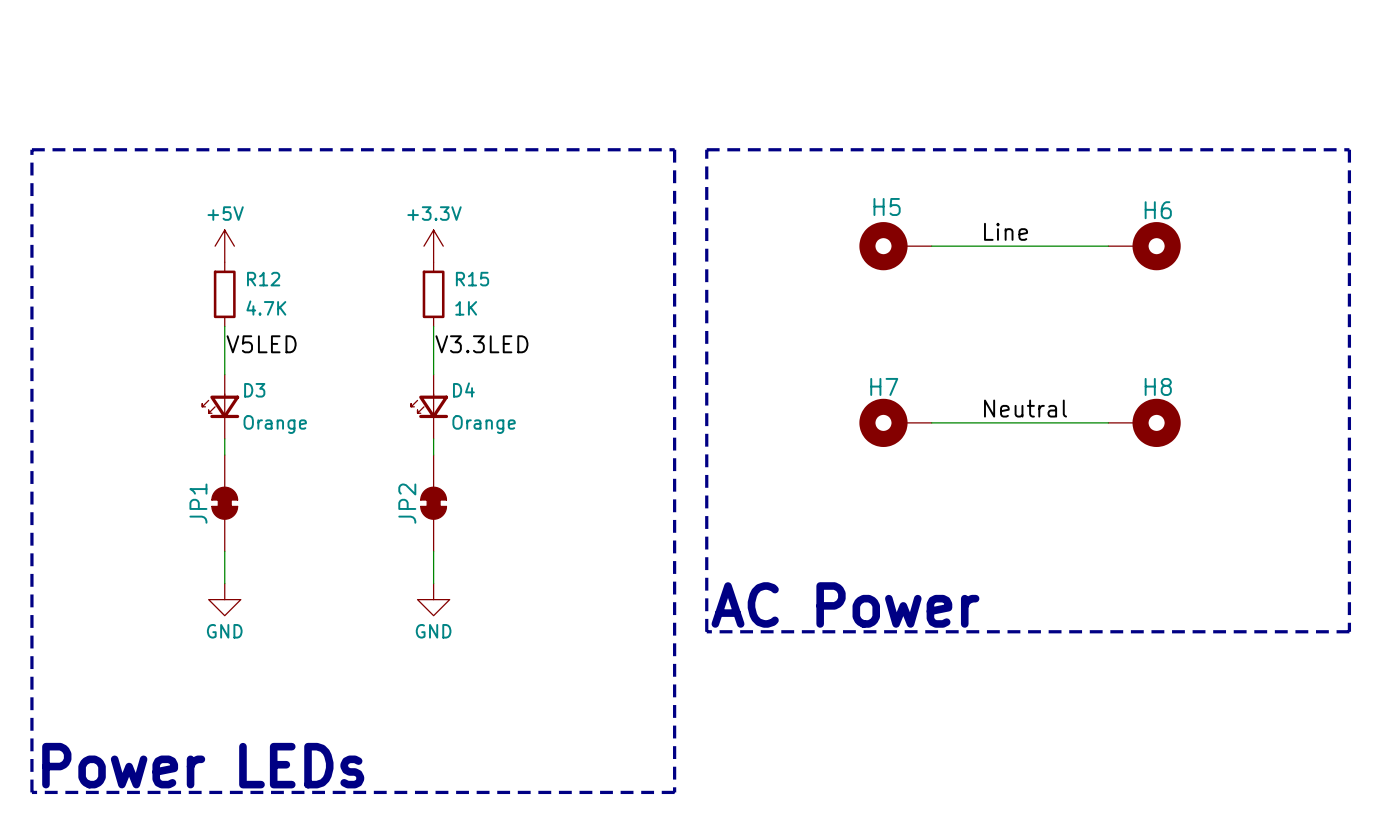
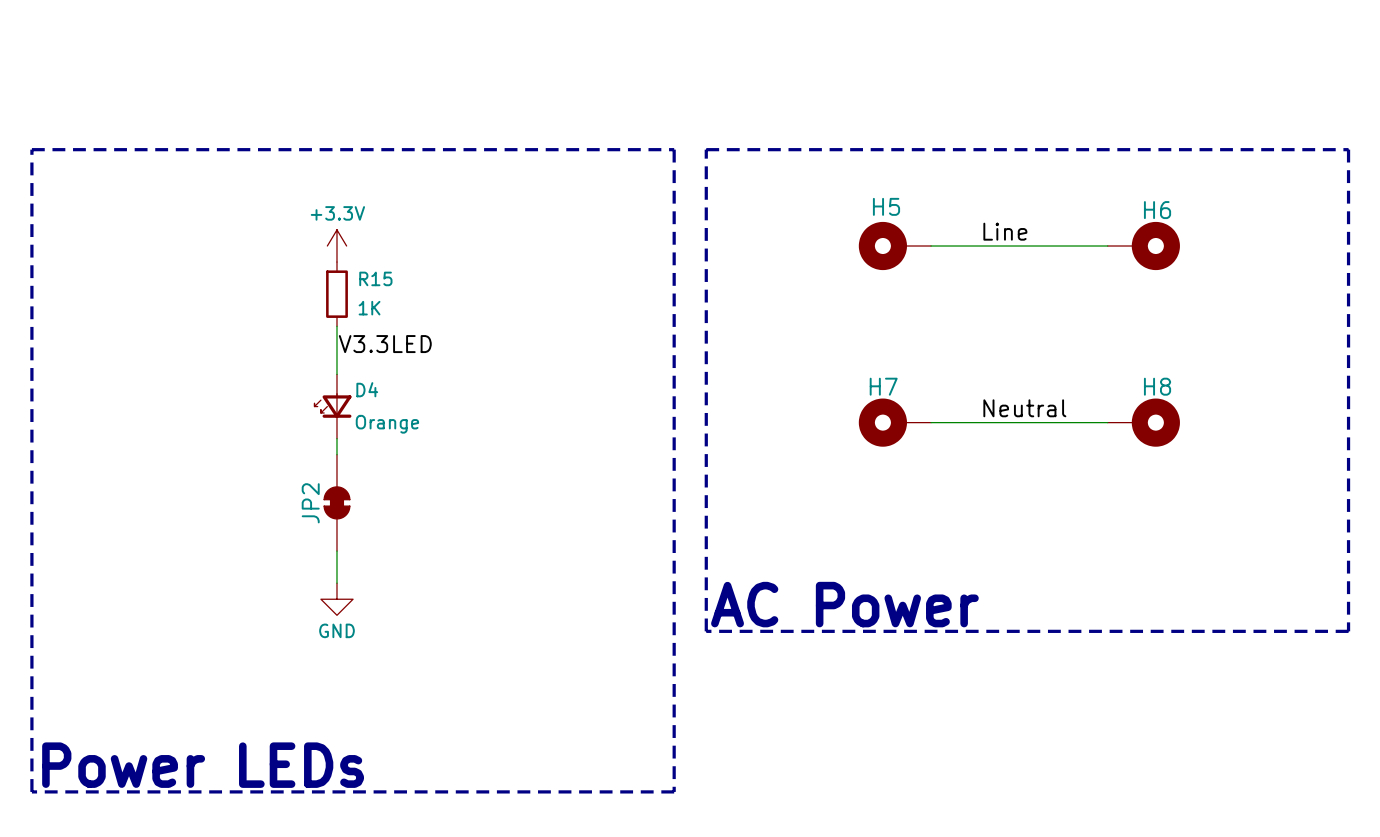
power symbol: +5V (224, 246) -> none
power symbol position: +3.3V (433, 246) -> +3.3V (336, 246)
R12: 4.7K (224, 294) -> none
R15 position: (433, 294) -> (336, 294)
wire: (224, 326) (224, 374) -> none
wire: (433, 326) (433, 374) -> (336, 326) (336, 374)
label: V5LED (261, 344) -> none
label position: V3.3LED (481, 344) -> V3.3LED (385, 344)
D3: Orange (220, 406) -> none
D4 position: (429, 406) -> (332, 406)
wire: (224, 438) (224, 455) -> none
wire: (433, 438) (433, 455) -> (336, 438) (336, 454)
JP1: (224, 503) -> none
JP2 position: (433, 503) -> (336, 502)
wire: (224, 551) (224, 583) -> none
wire: (433, 551) (433, 583) -> (336, 551) (336, 583)
power symbol: GND (224, 599) -> none
power symbol: none -> GND (336, 599)
power symbol: GND (433, 599) -> none

